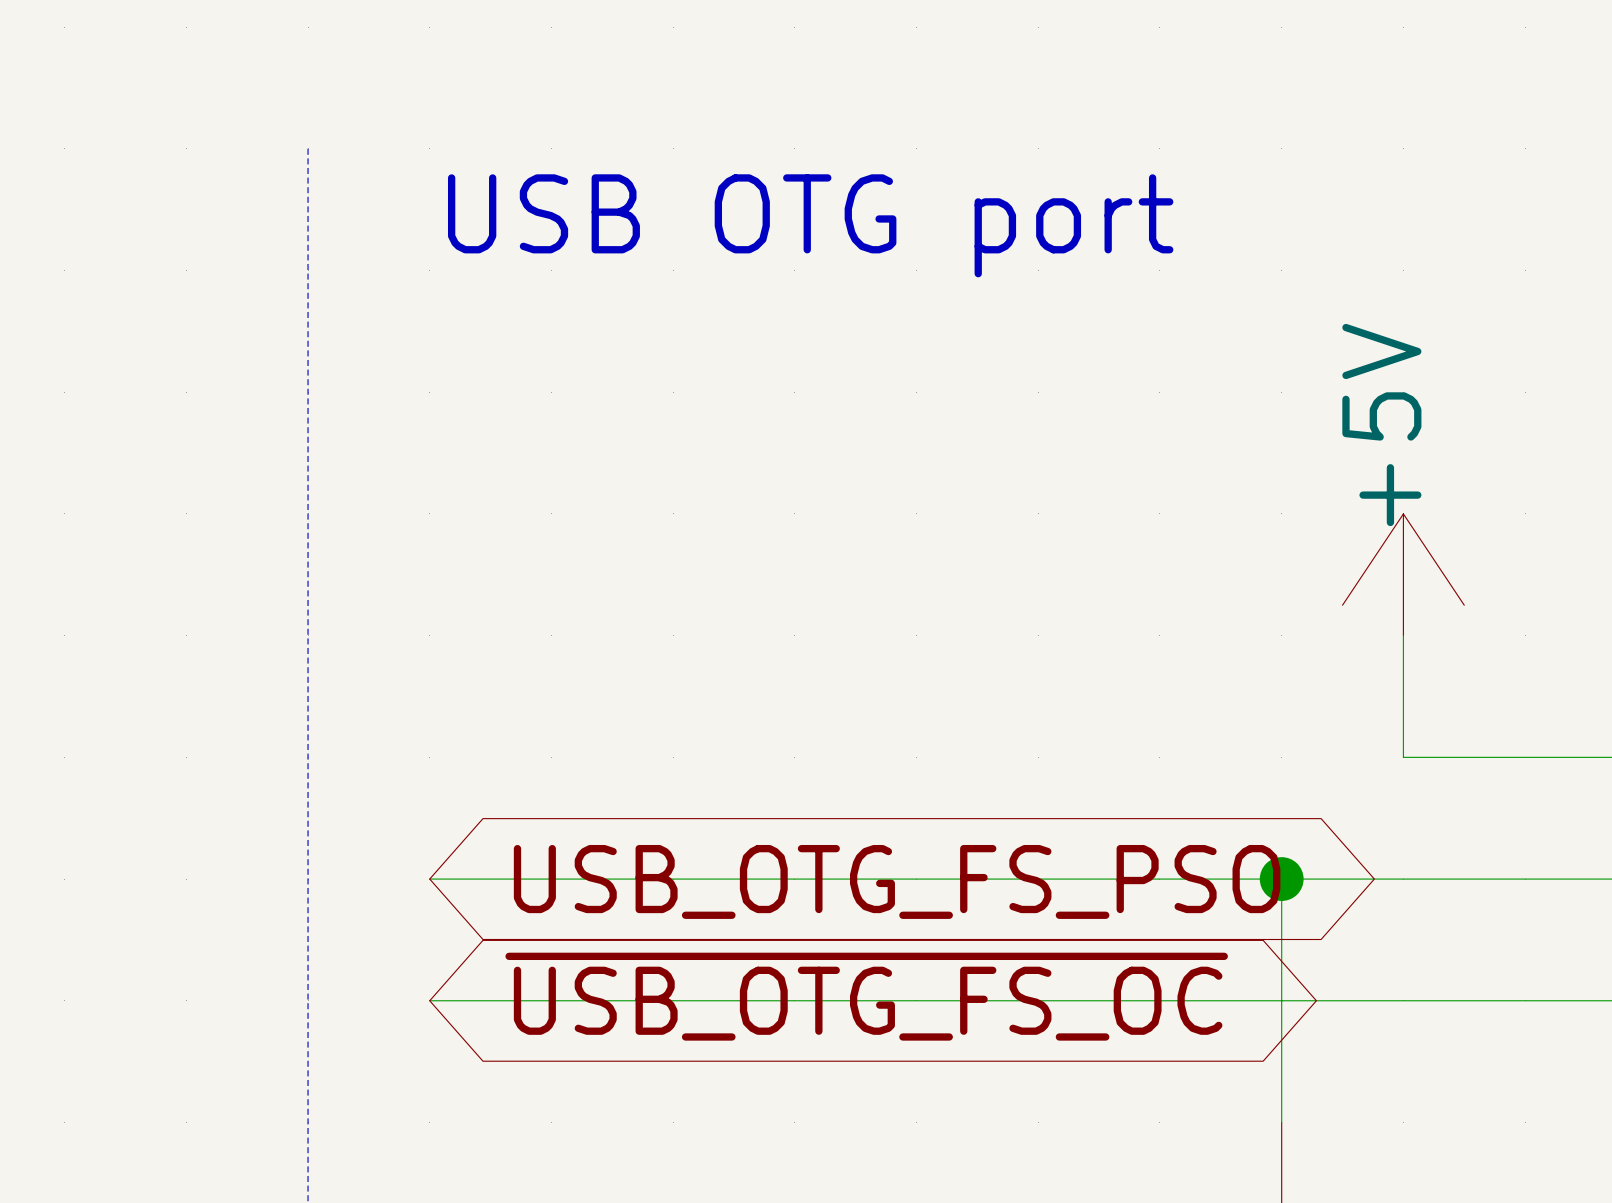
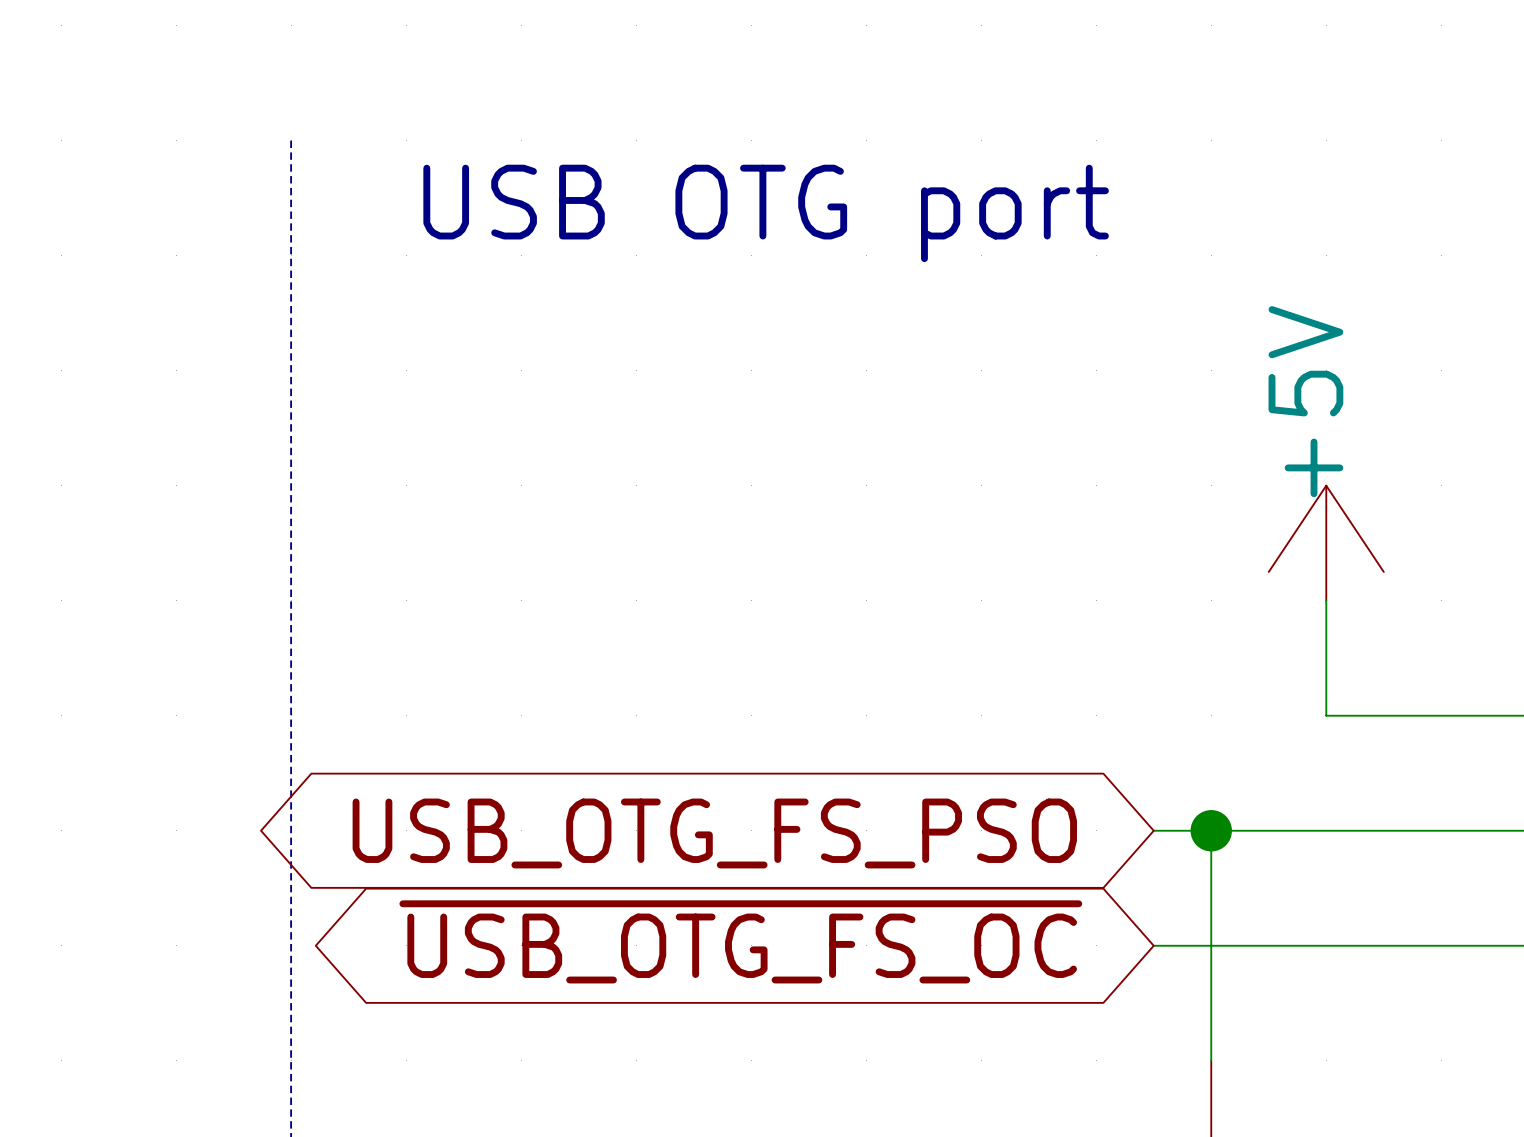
wire: (429, 879) (1220, 879) -> none
global label rotation: 0° (897, 881) -> 180° (714, 833)
global label rotation: 0° (866, 996) -> 180° (740, 941)
wire: (429, 1000) (1220, 1000) -> none

